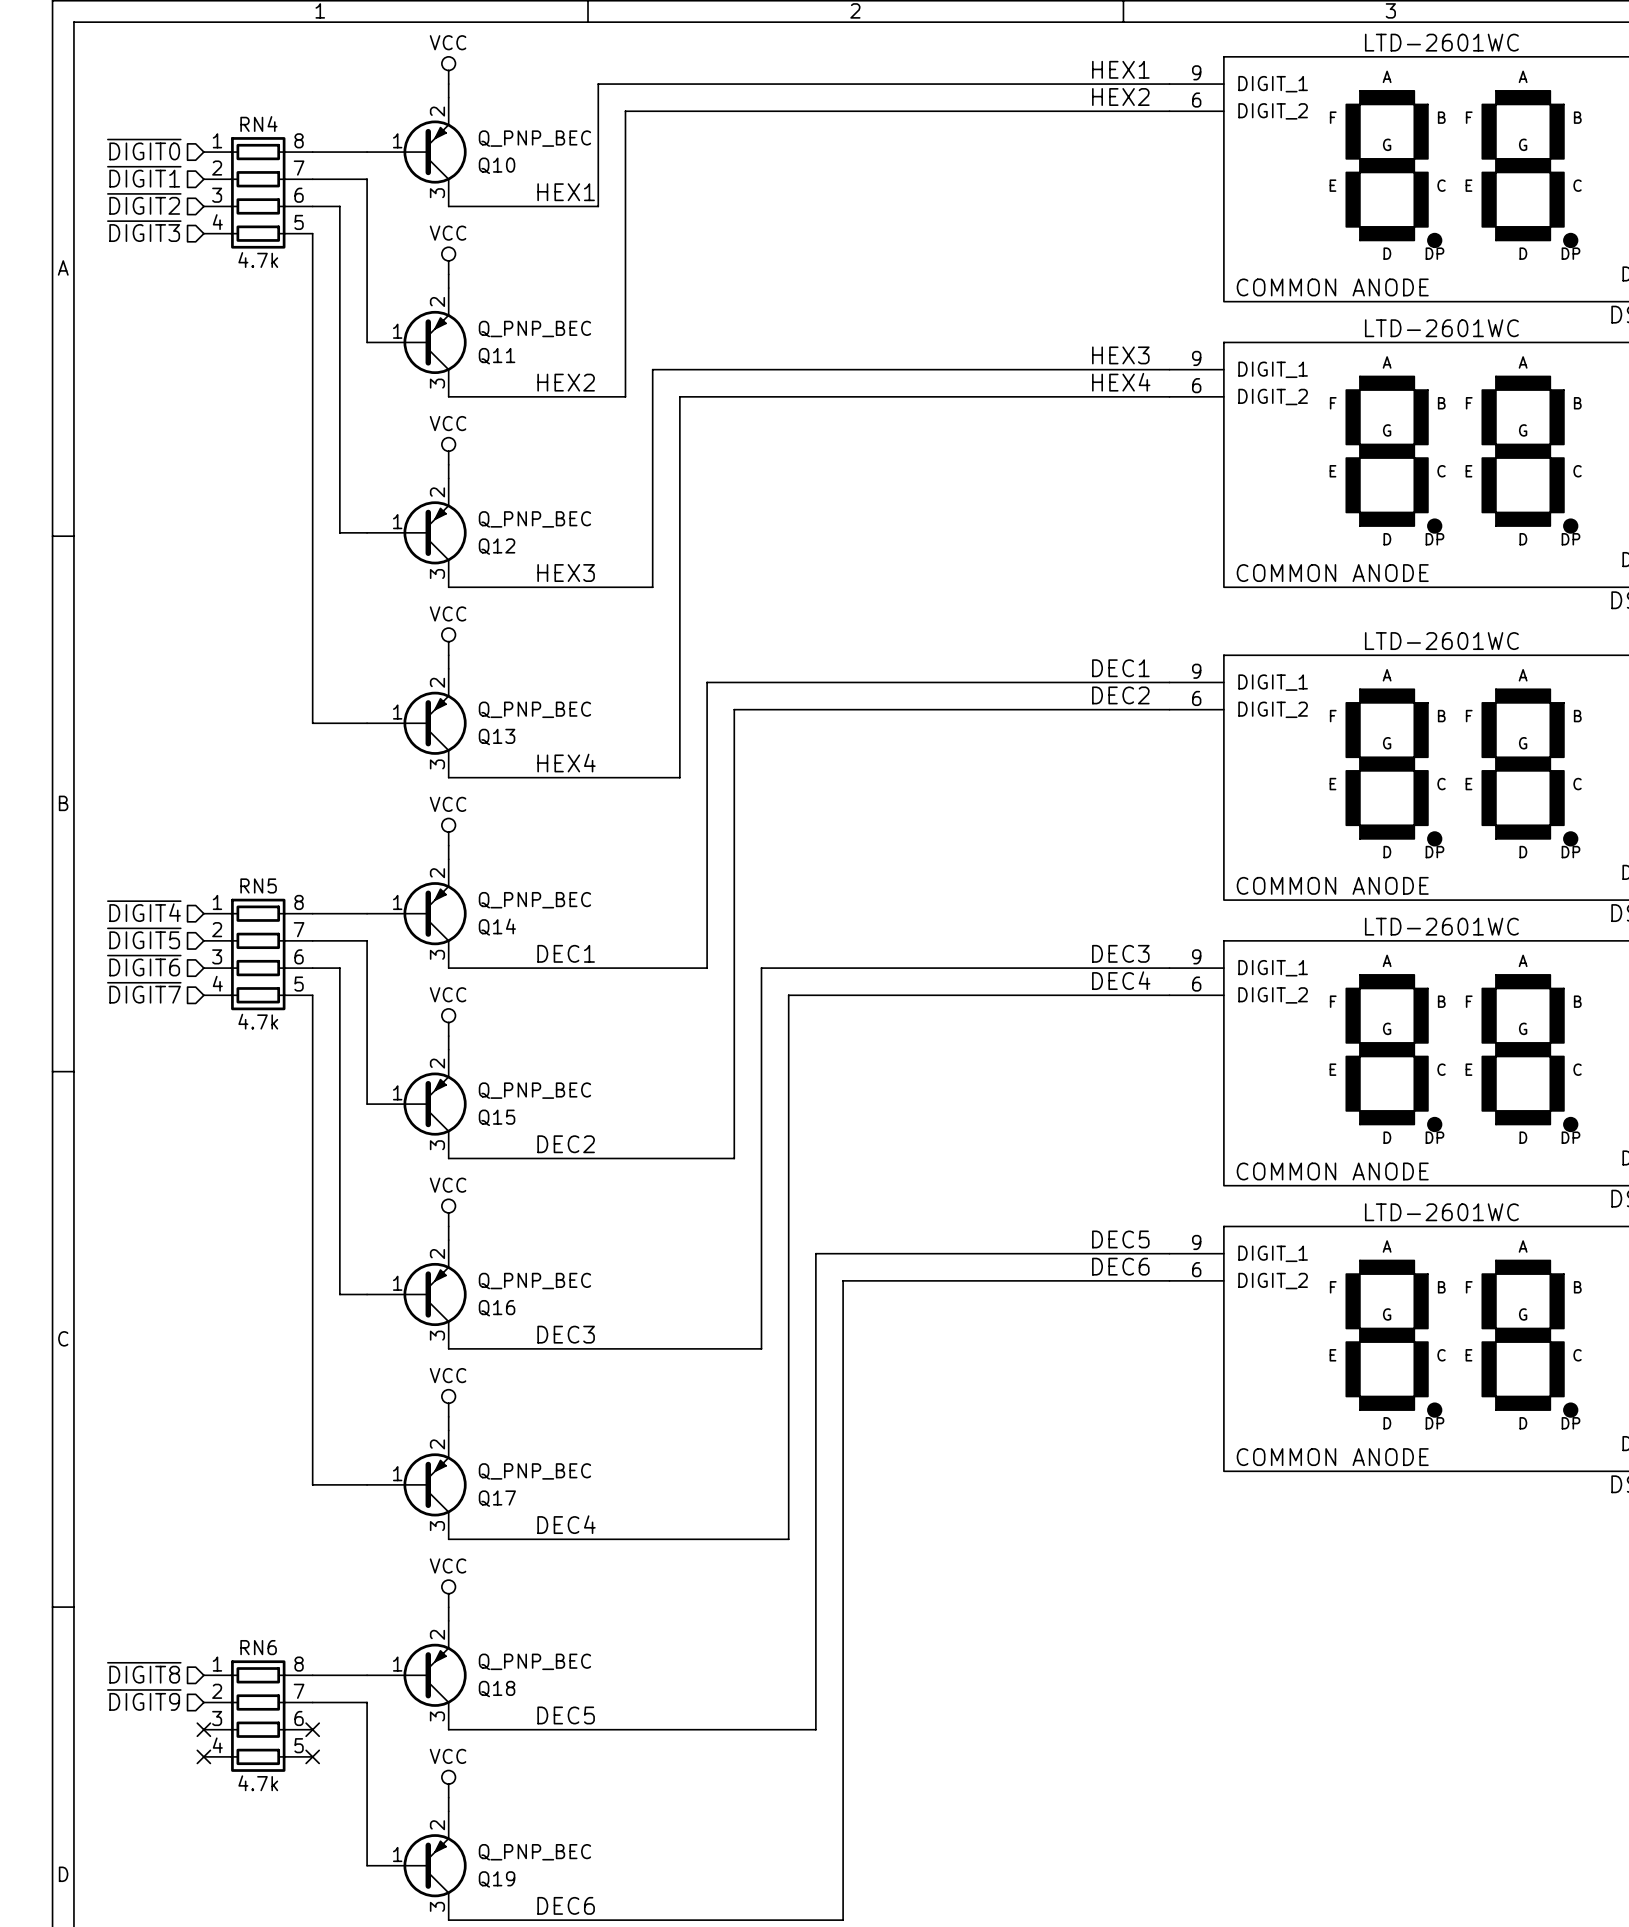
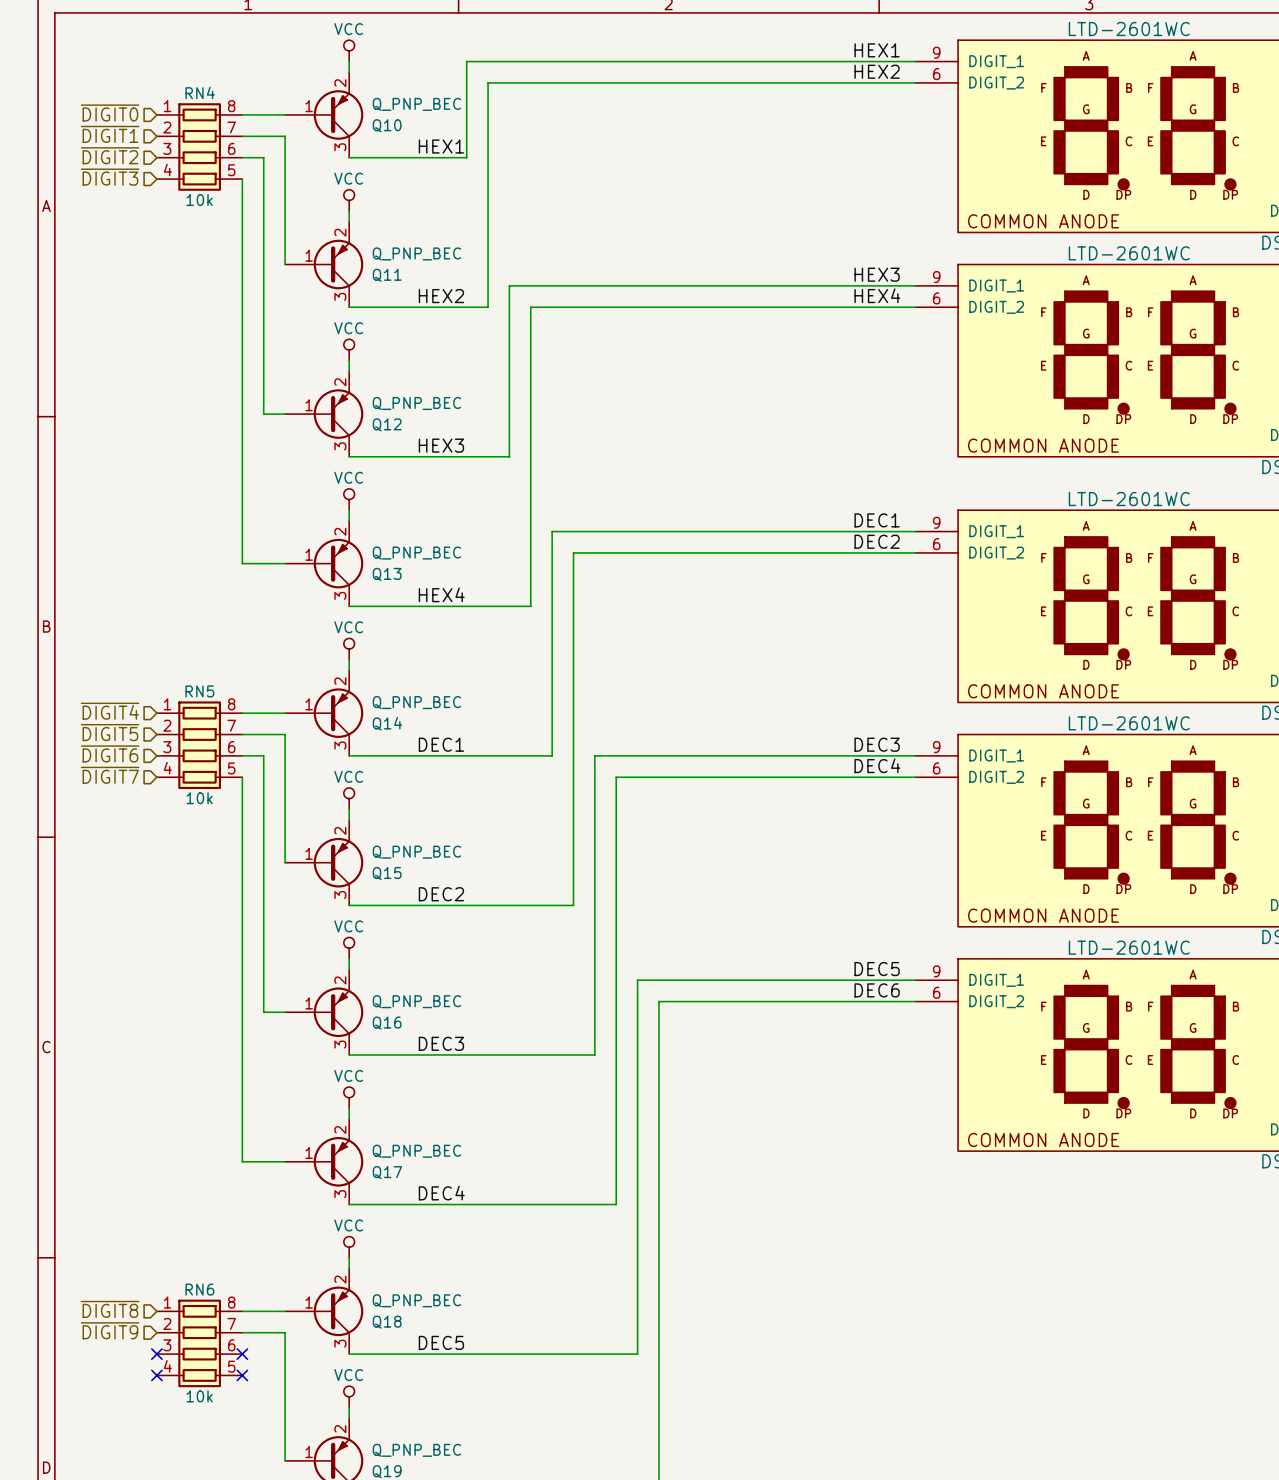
RN4 value: 4.7k (258, 260) -> 10k (199, 200)
RN5 value: 4.7k (258, 1021) -> 10k (199, 798)
RN6 value: 4.7k (258, 1783) -> 10k (199, 1396)

